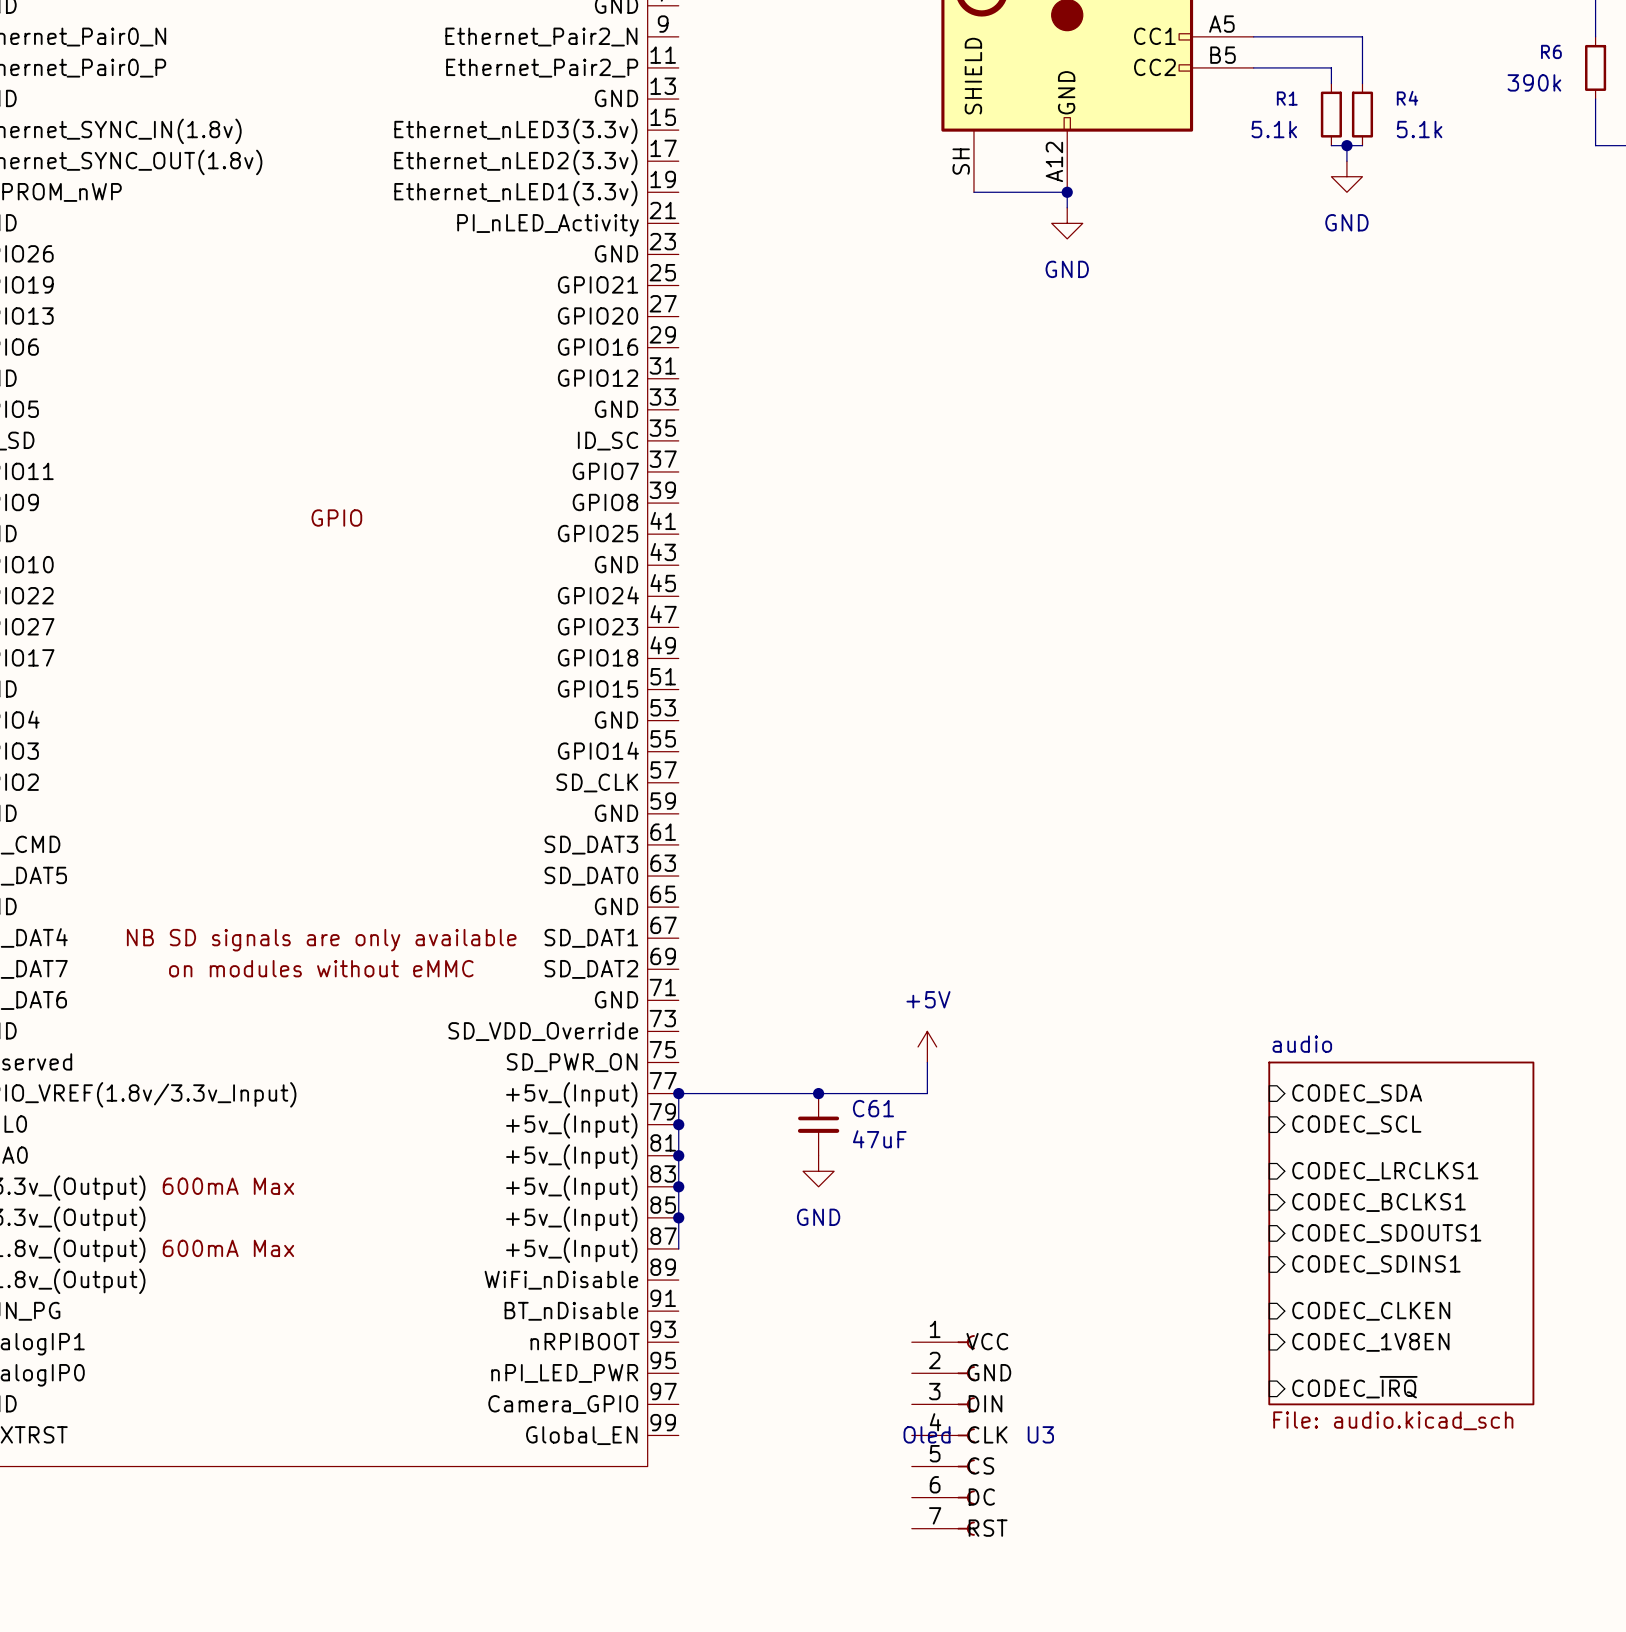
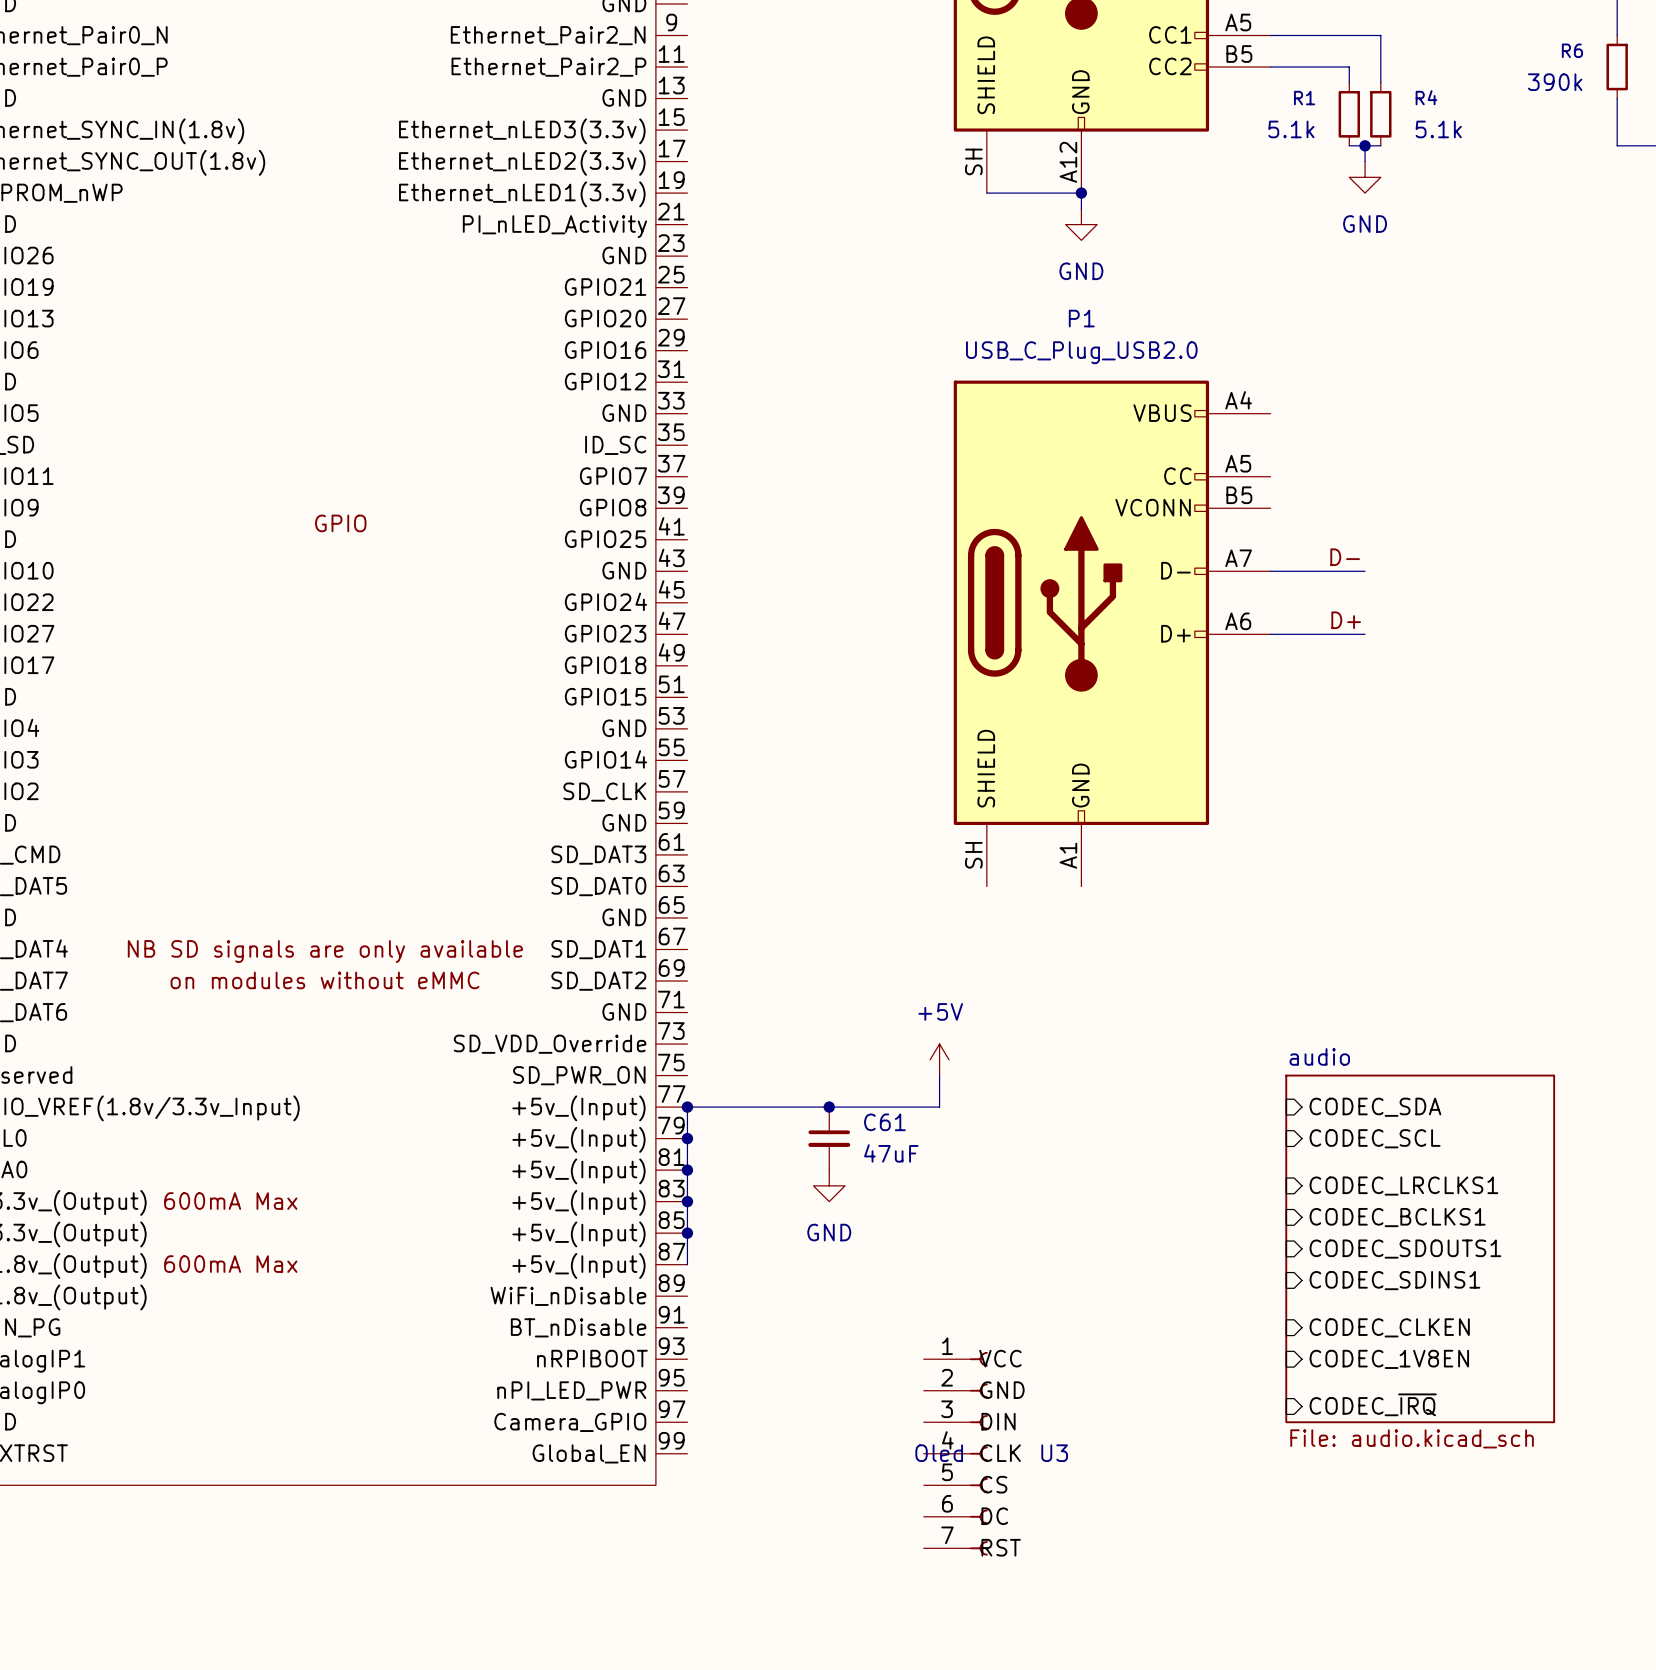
label: none -> D- (1345, 557)
wire: none -> (1270, 571) (1365, 571)
label: none -> D+ (1346, 620)
P1: none -> USB_C_Plug_USB2.0 (1112, 633)
wire: none -> (1270, 634) (1365, 634)

